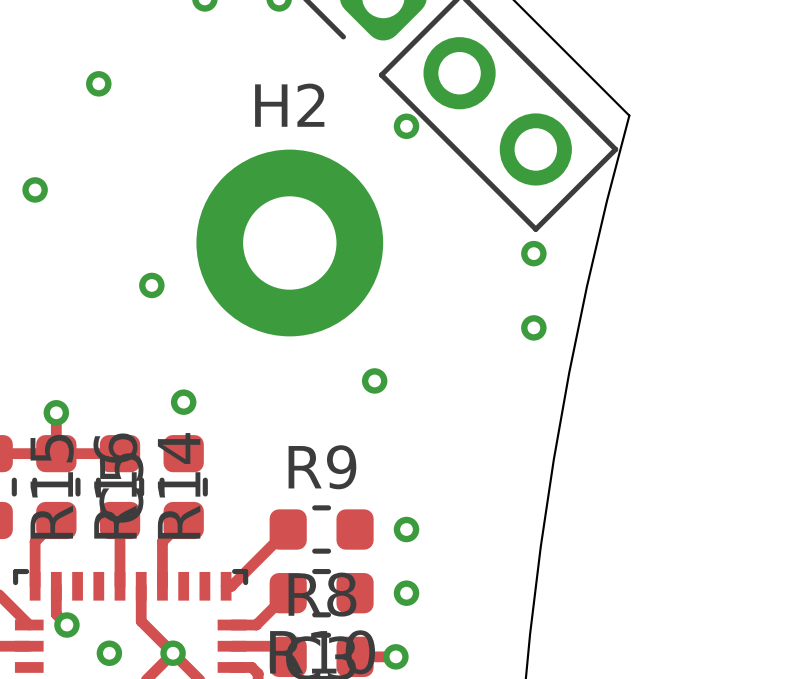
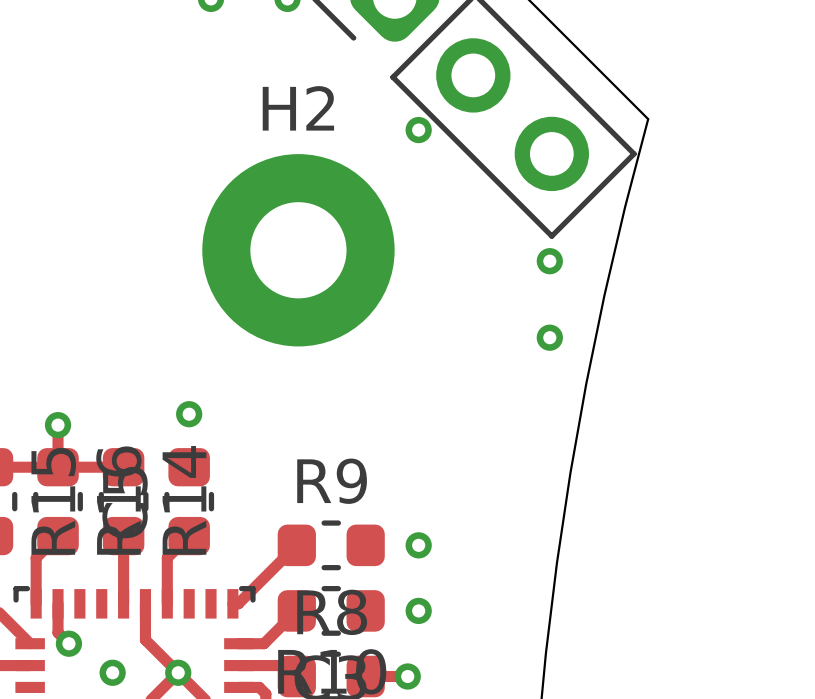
via: (98, 83) -> none
via: (35, 189) -> none
via: (151, 285) -> none
via: (374, 380) -> none

